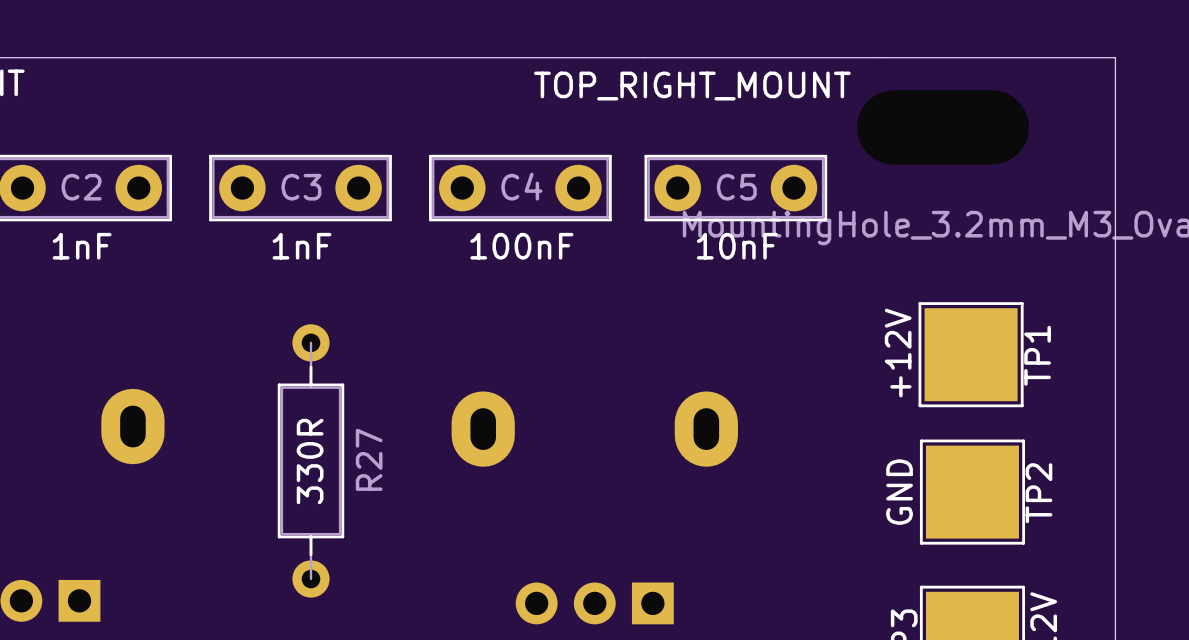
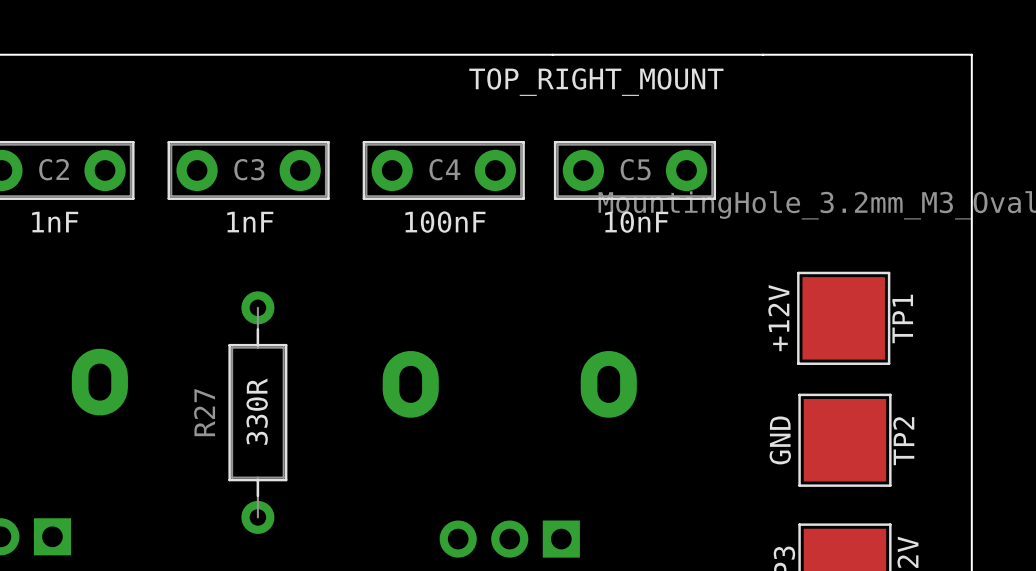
R27 name position: R27 (369, 459) -> R27 (204, 412)

